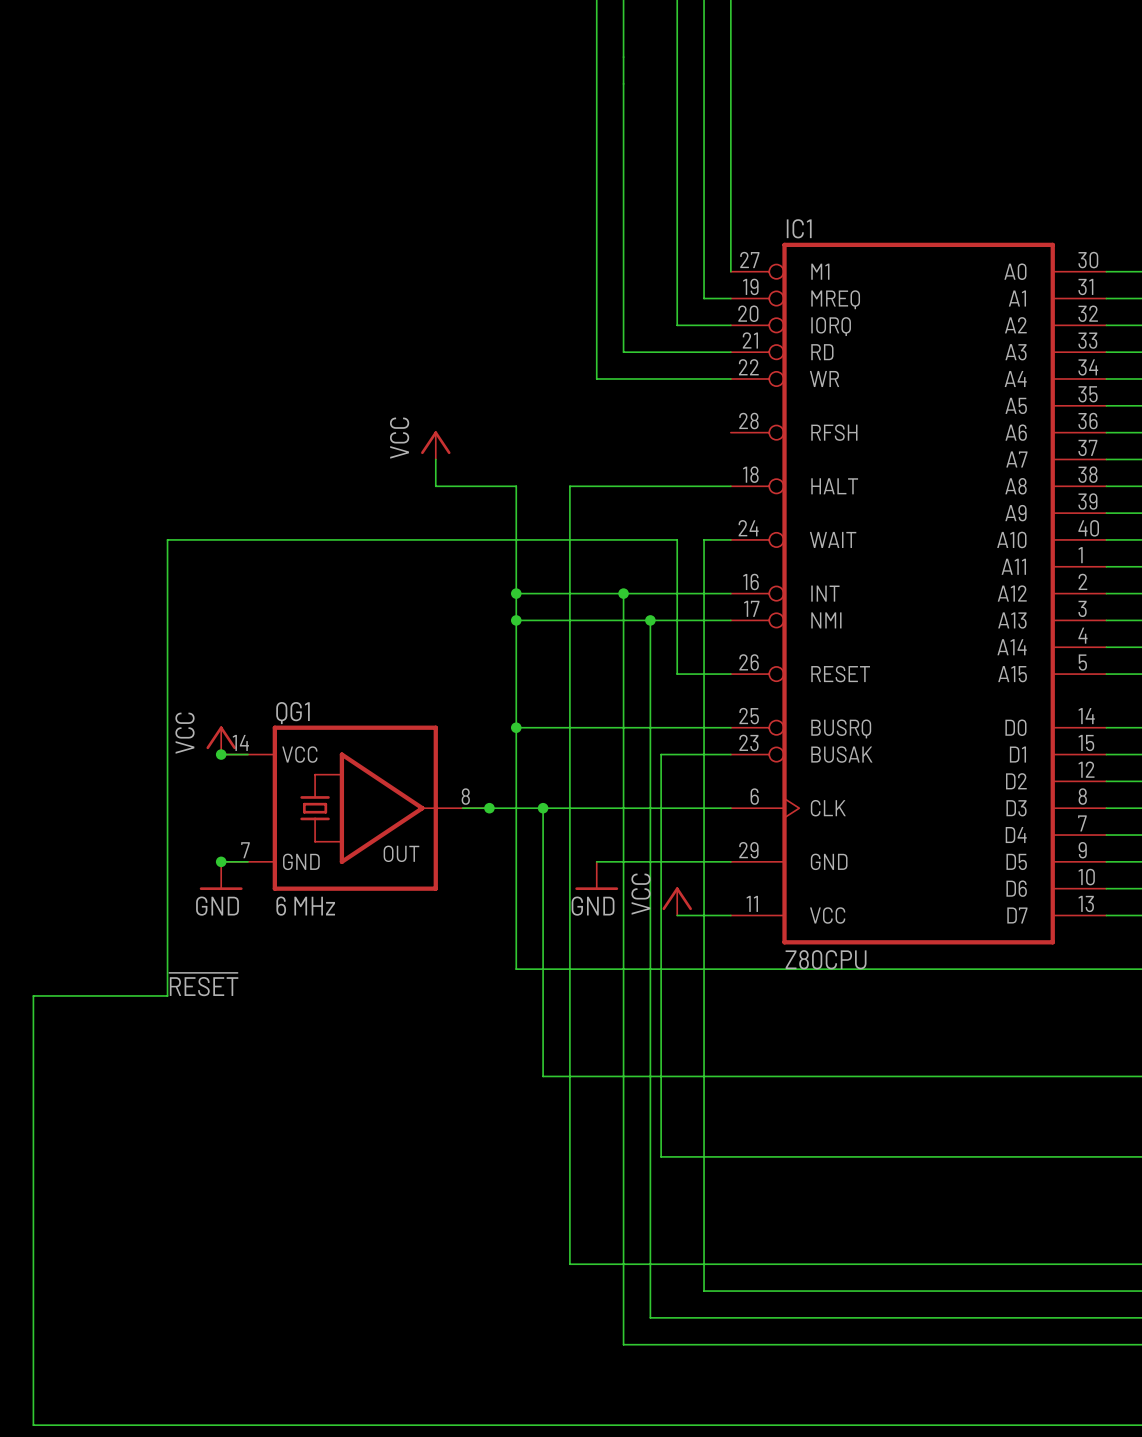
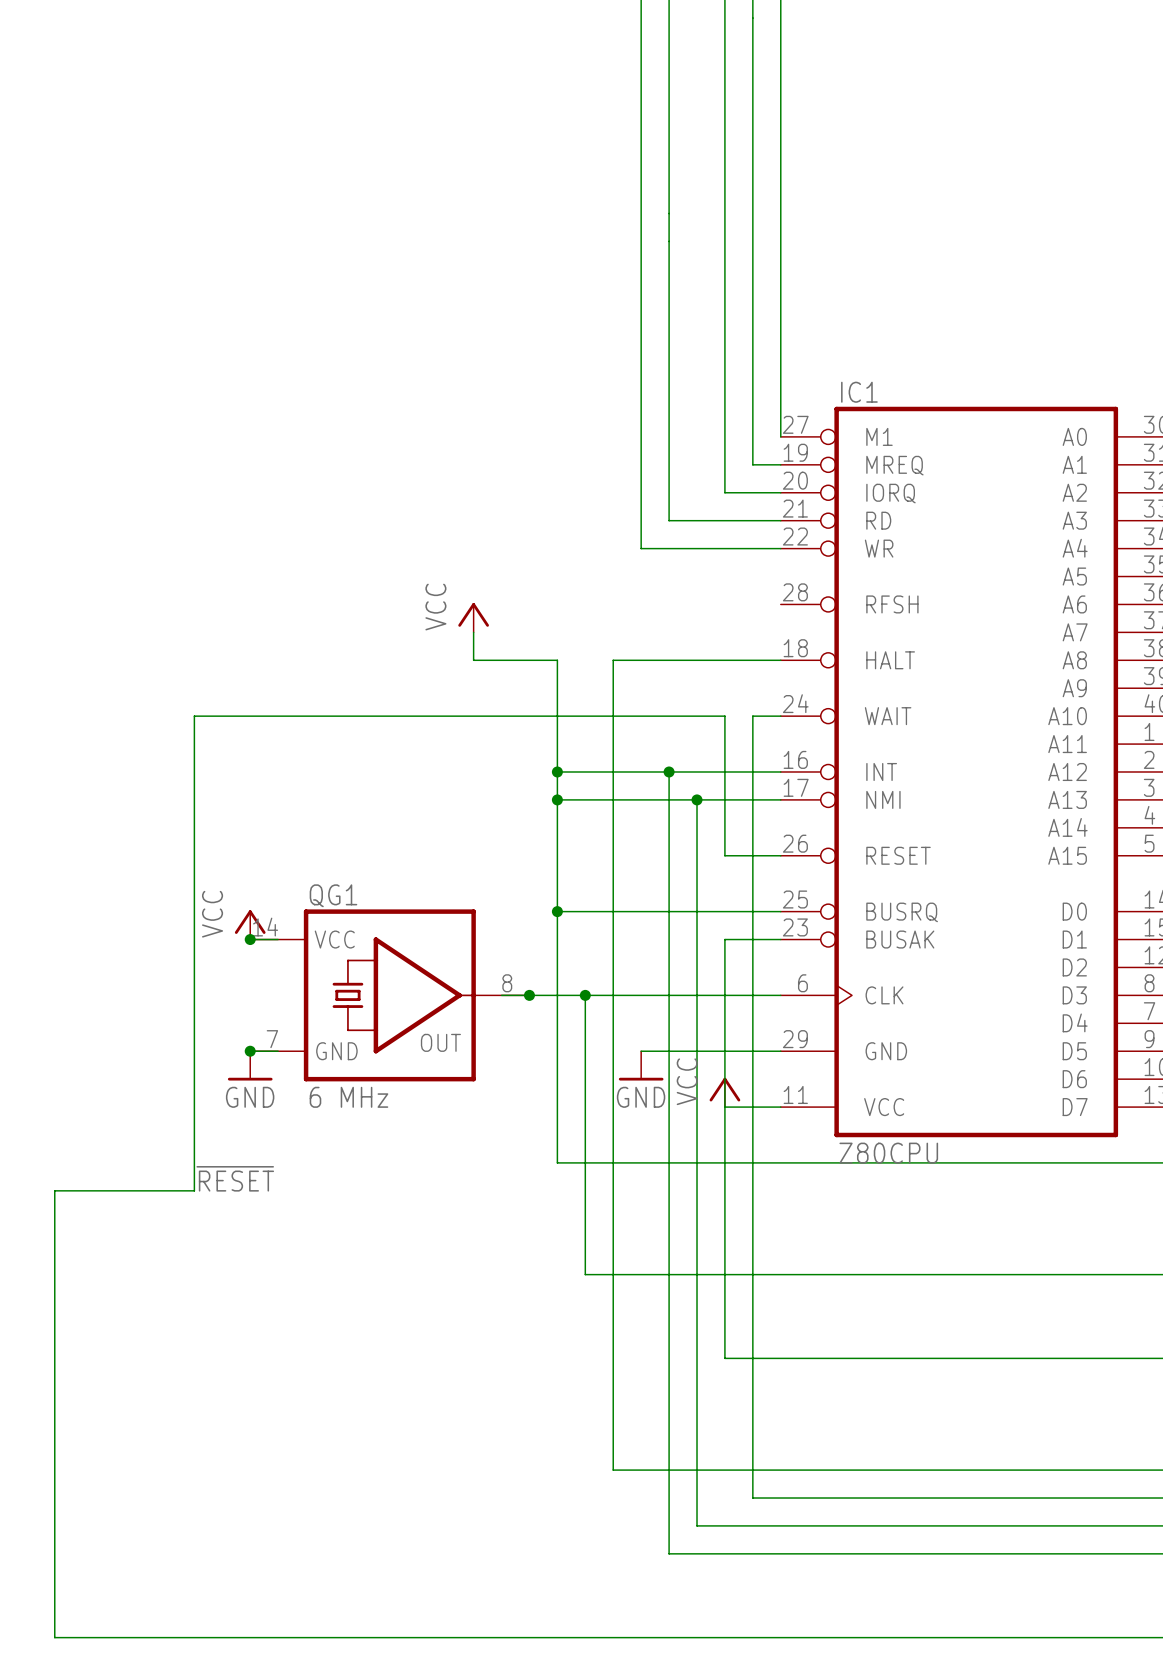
wire: (677, 754) (661, 754) (661, 1156) (677, 1156) -> (724, 939) (724, 1358)

